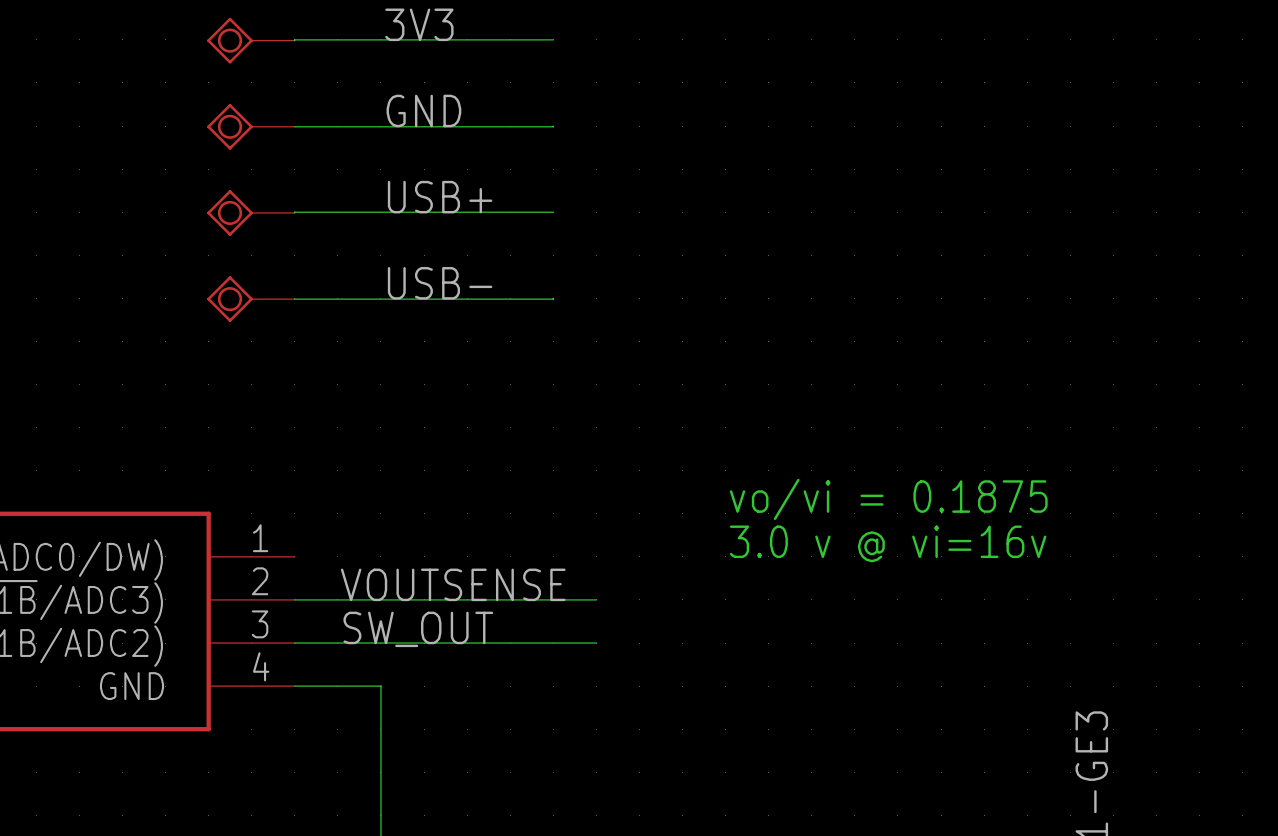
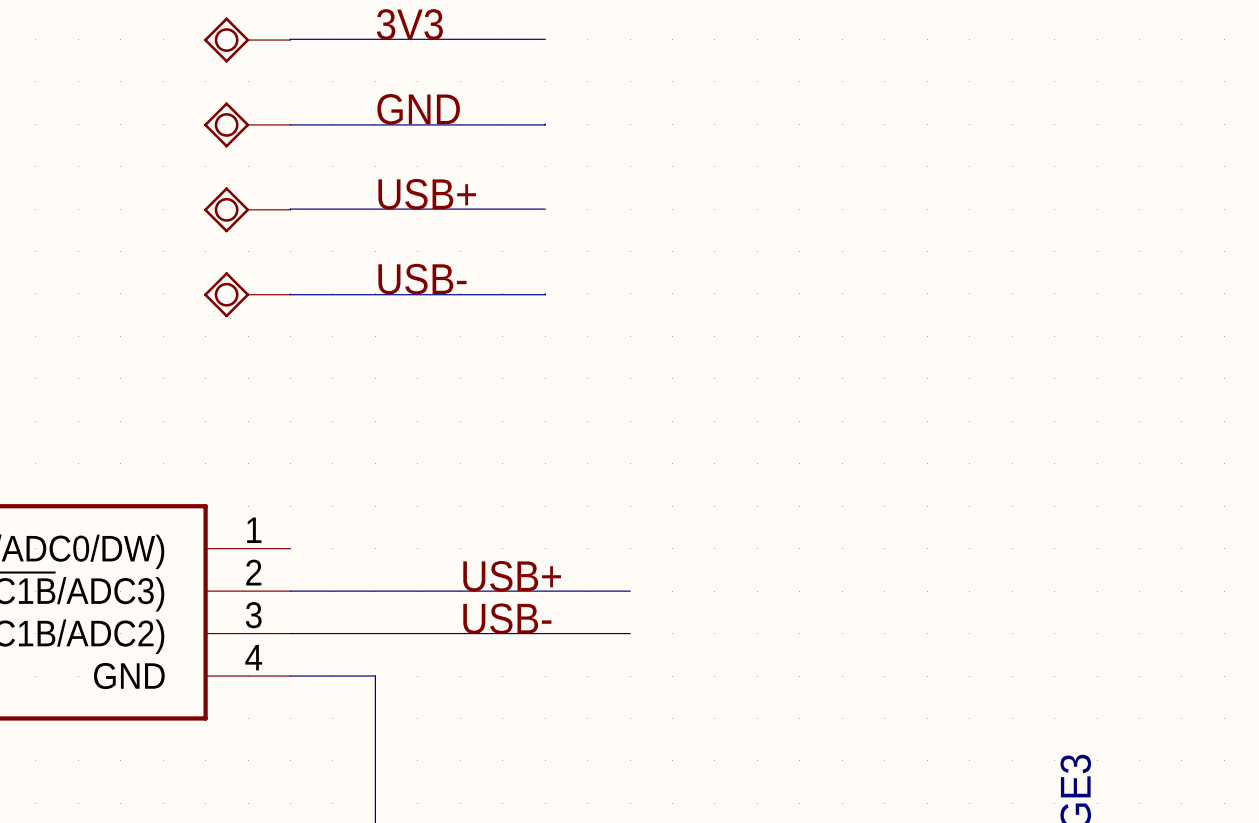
text: vo/vi = 0.1875 (888, 499) -> none
text: 3.0 v @ vi=16v (888, 543) -> none
label: VOUTSENSE (453, 584) -> none
label: none -> USB+ (512, 576)
wire: none -> (587, 591) (630, 591)
label: none -> USB- (507, 618)
label: SW_OUT (418, 629) -> none
wire: none -> (587, 633) (630, 633)

